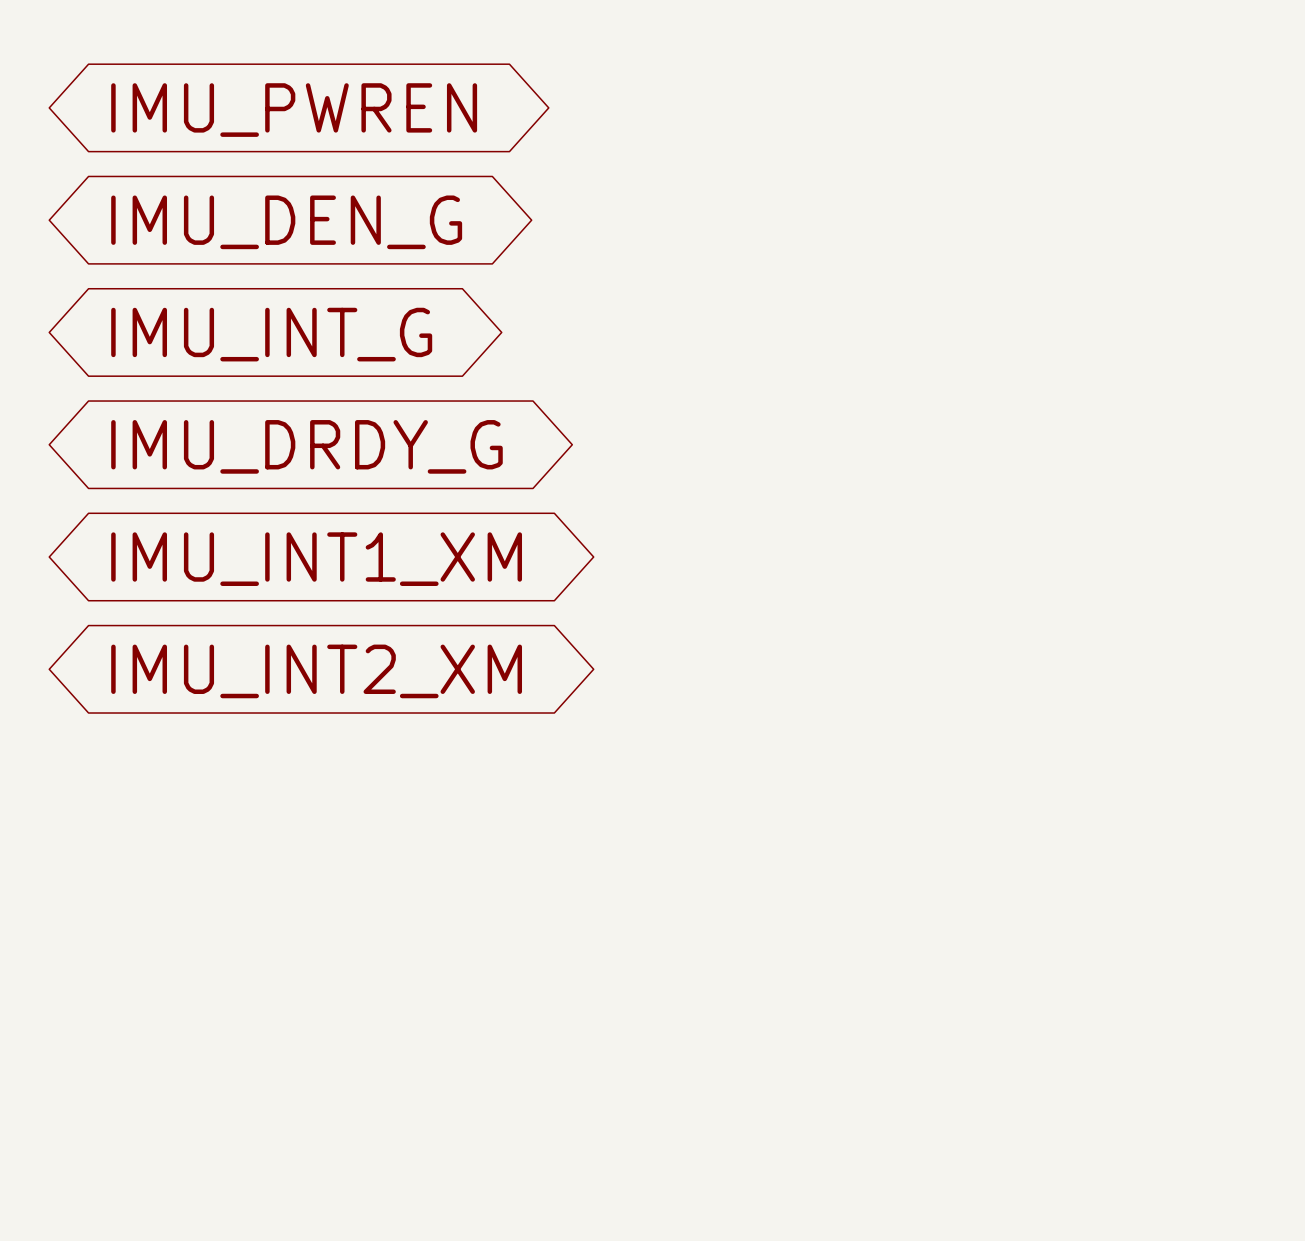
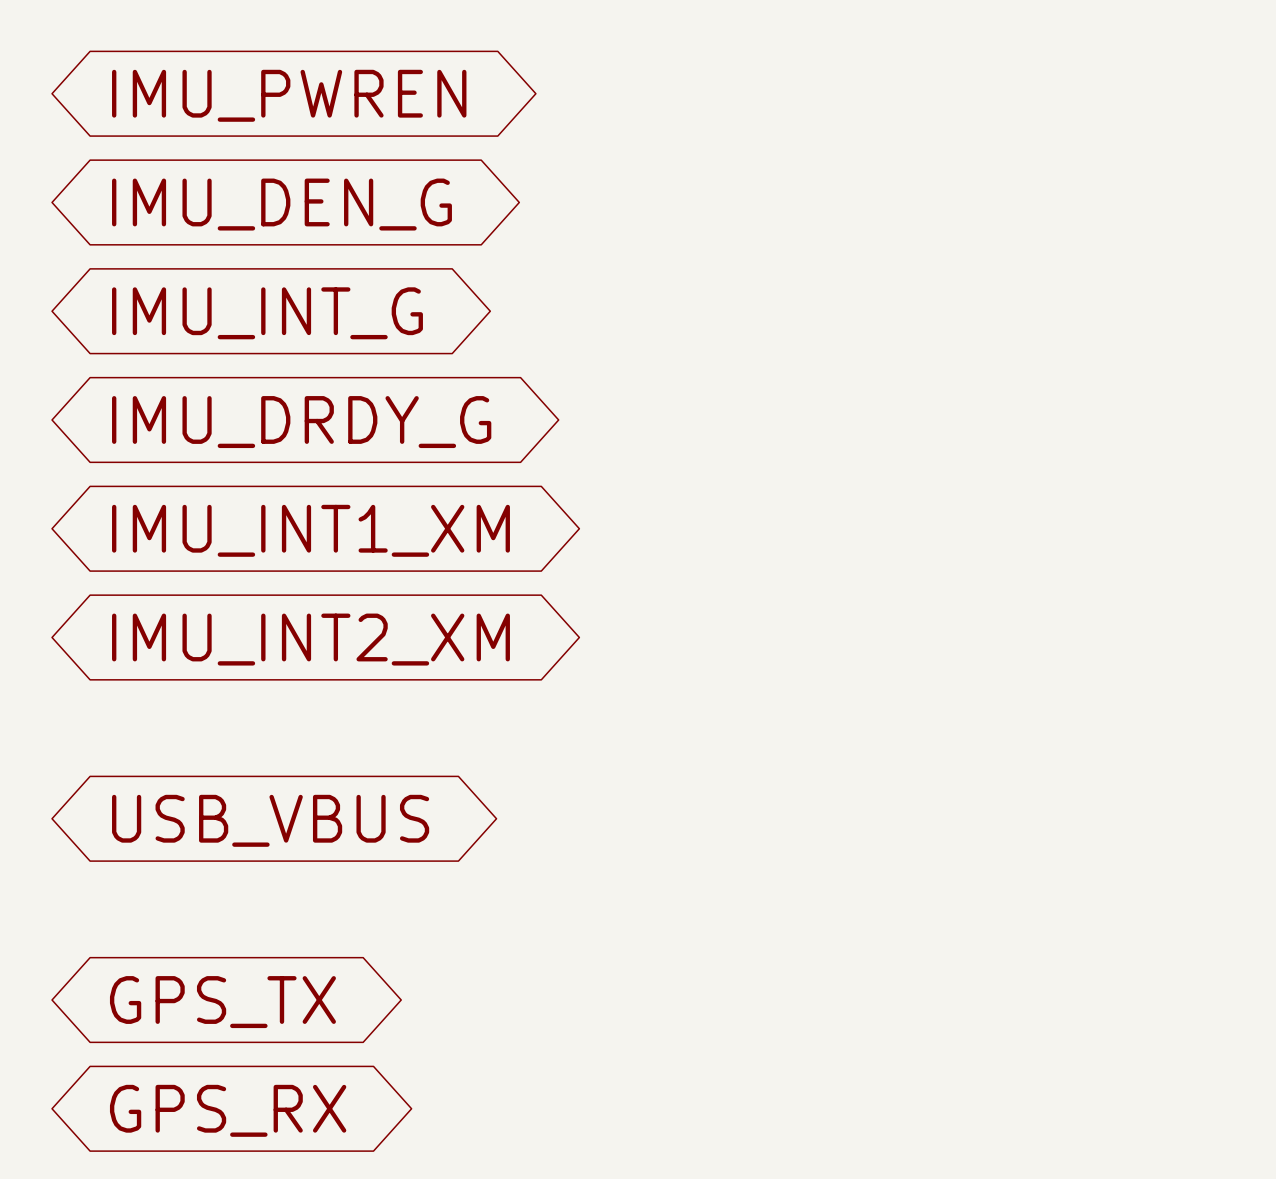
global label: none -> USB_VBUS (270, 820)
global label: none -> GPS_TX (222, 1002)
global label: none -> GPS_RX (228, 1110)

